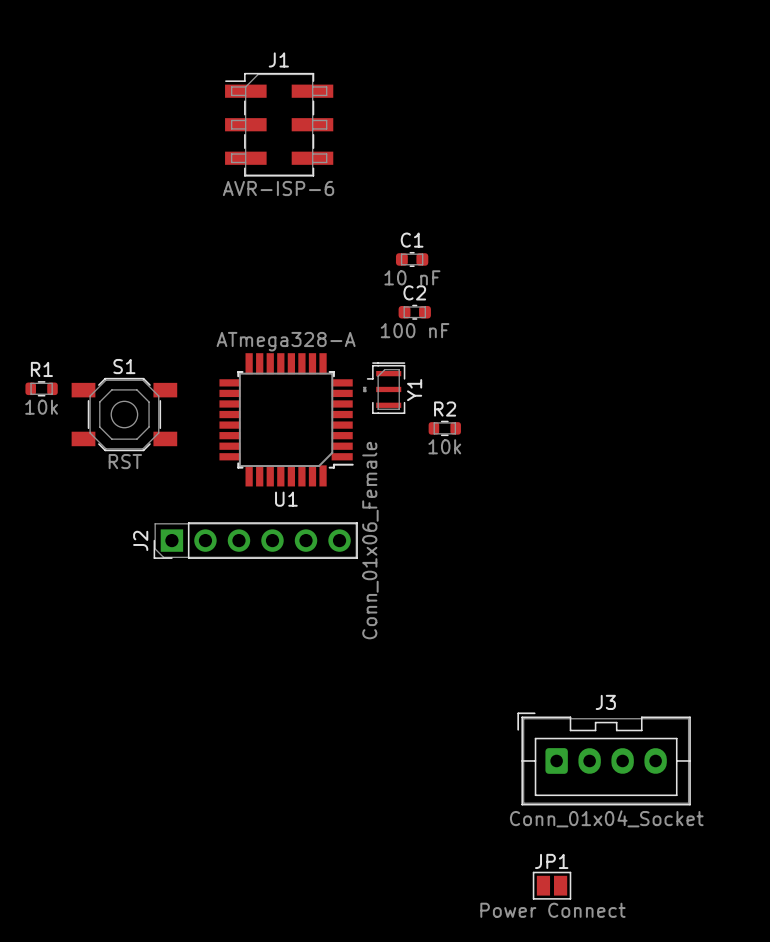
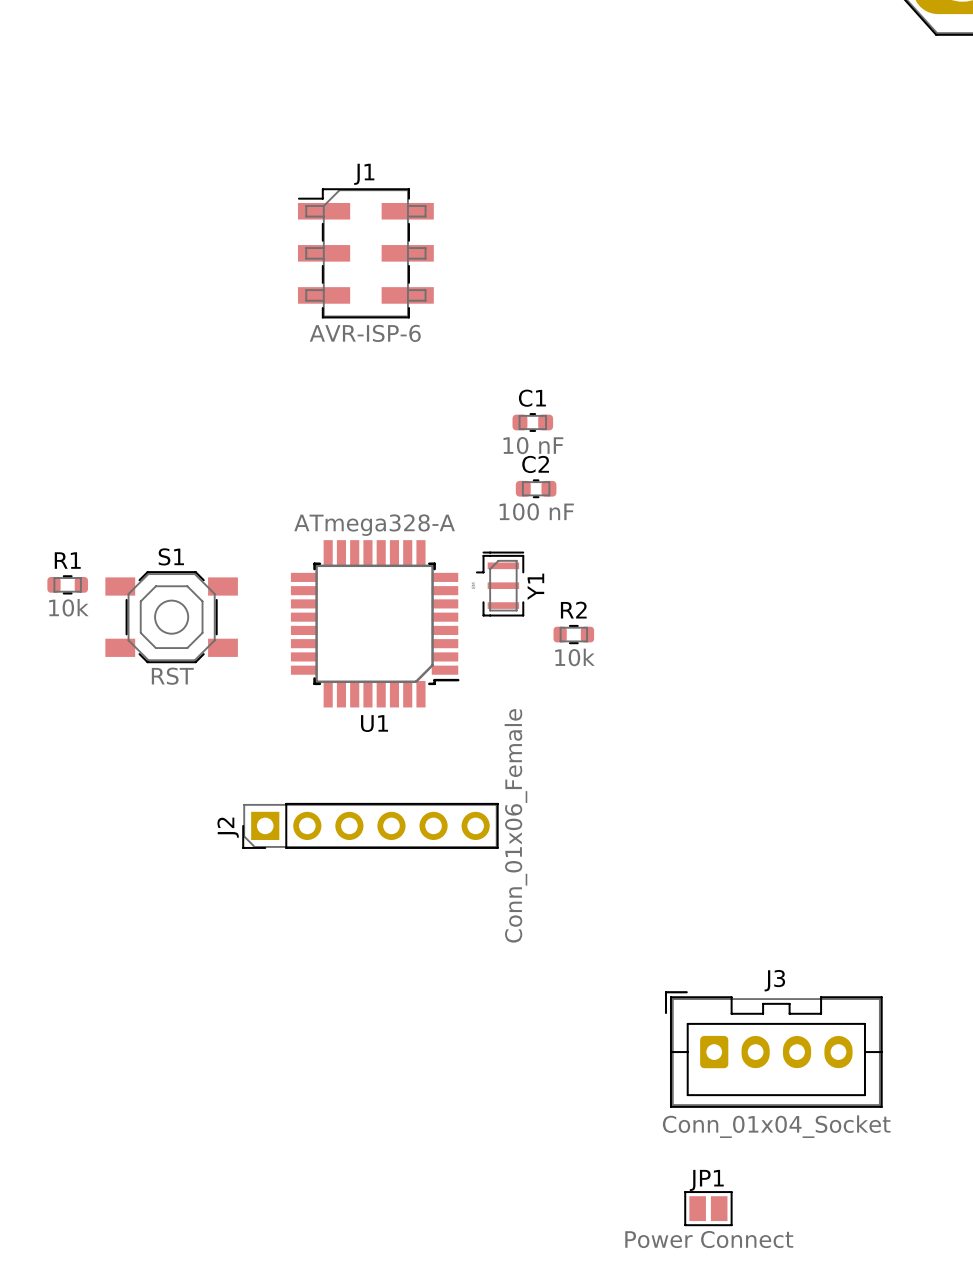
J2 position: (255, 540) -> (370, 825)

